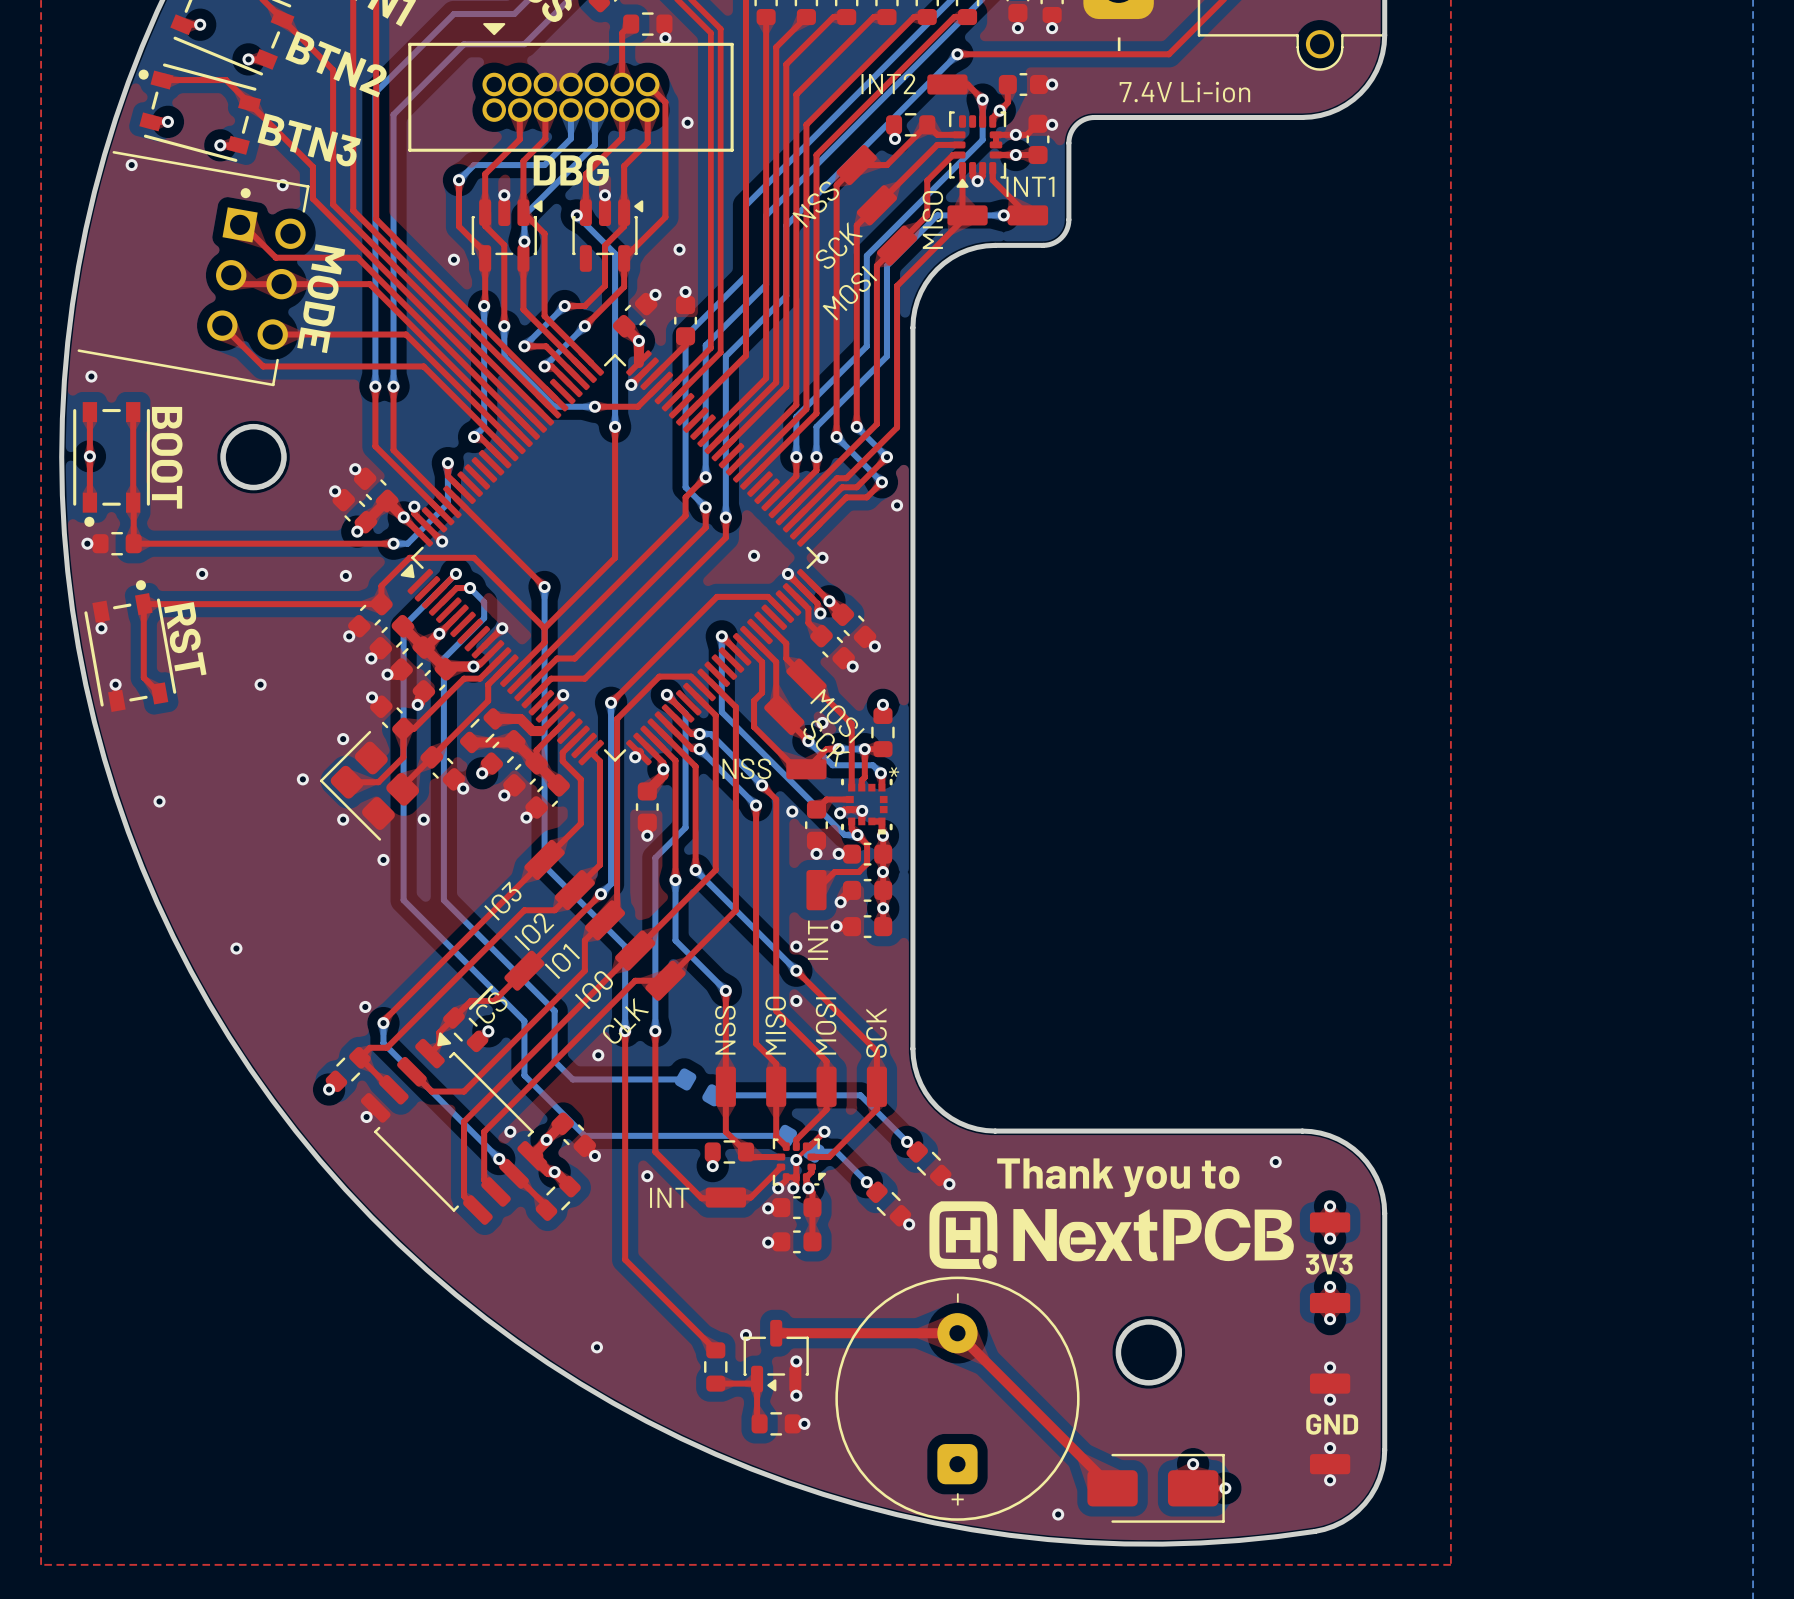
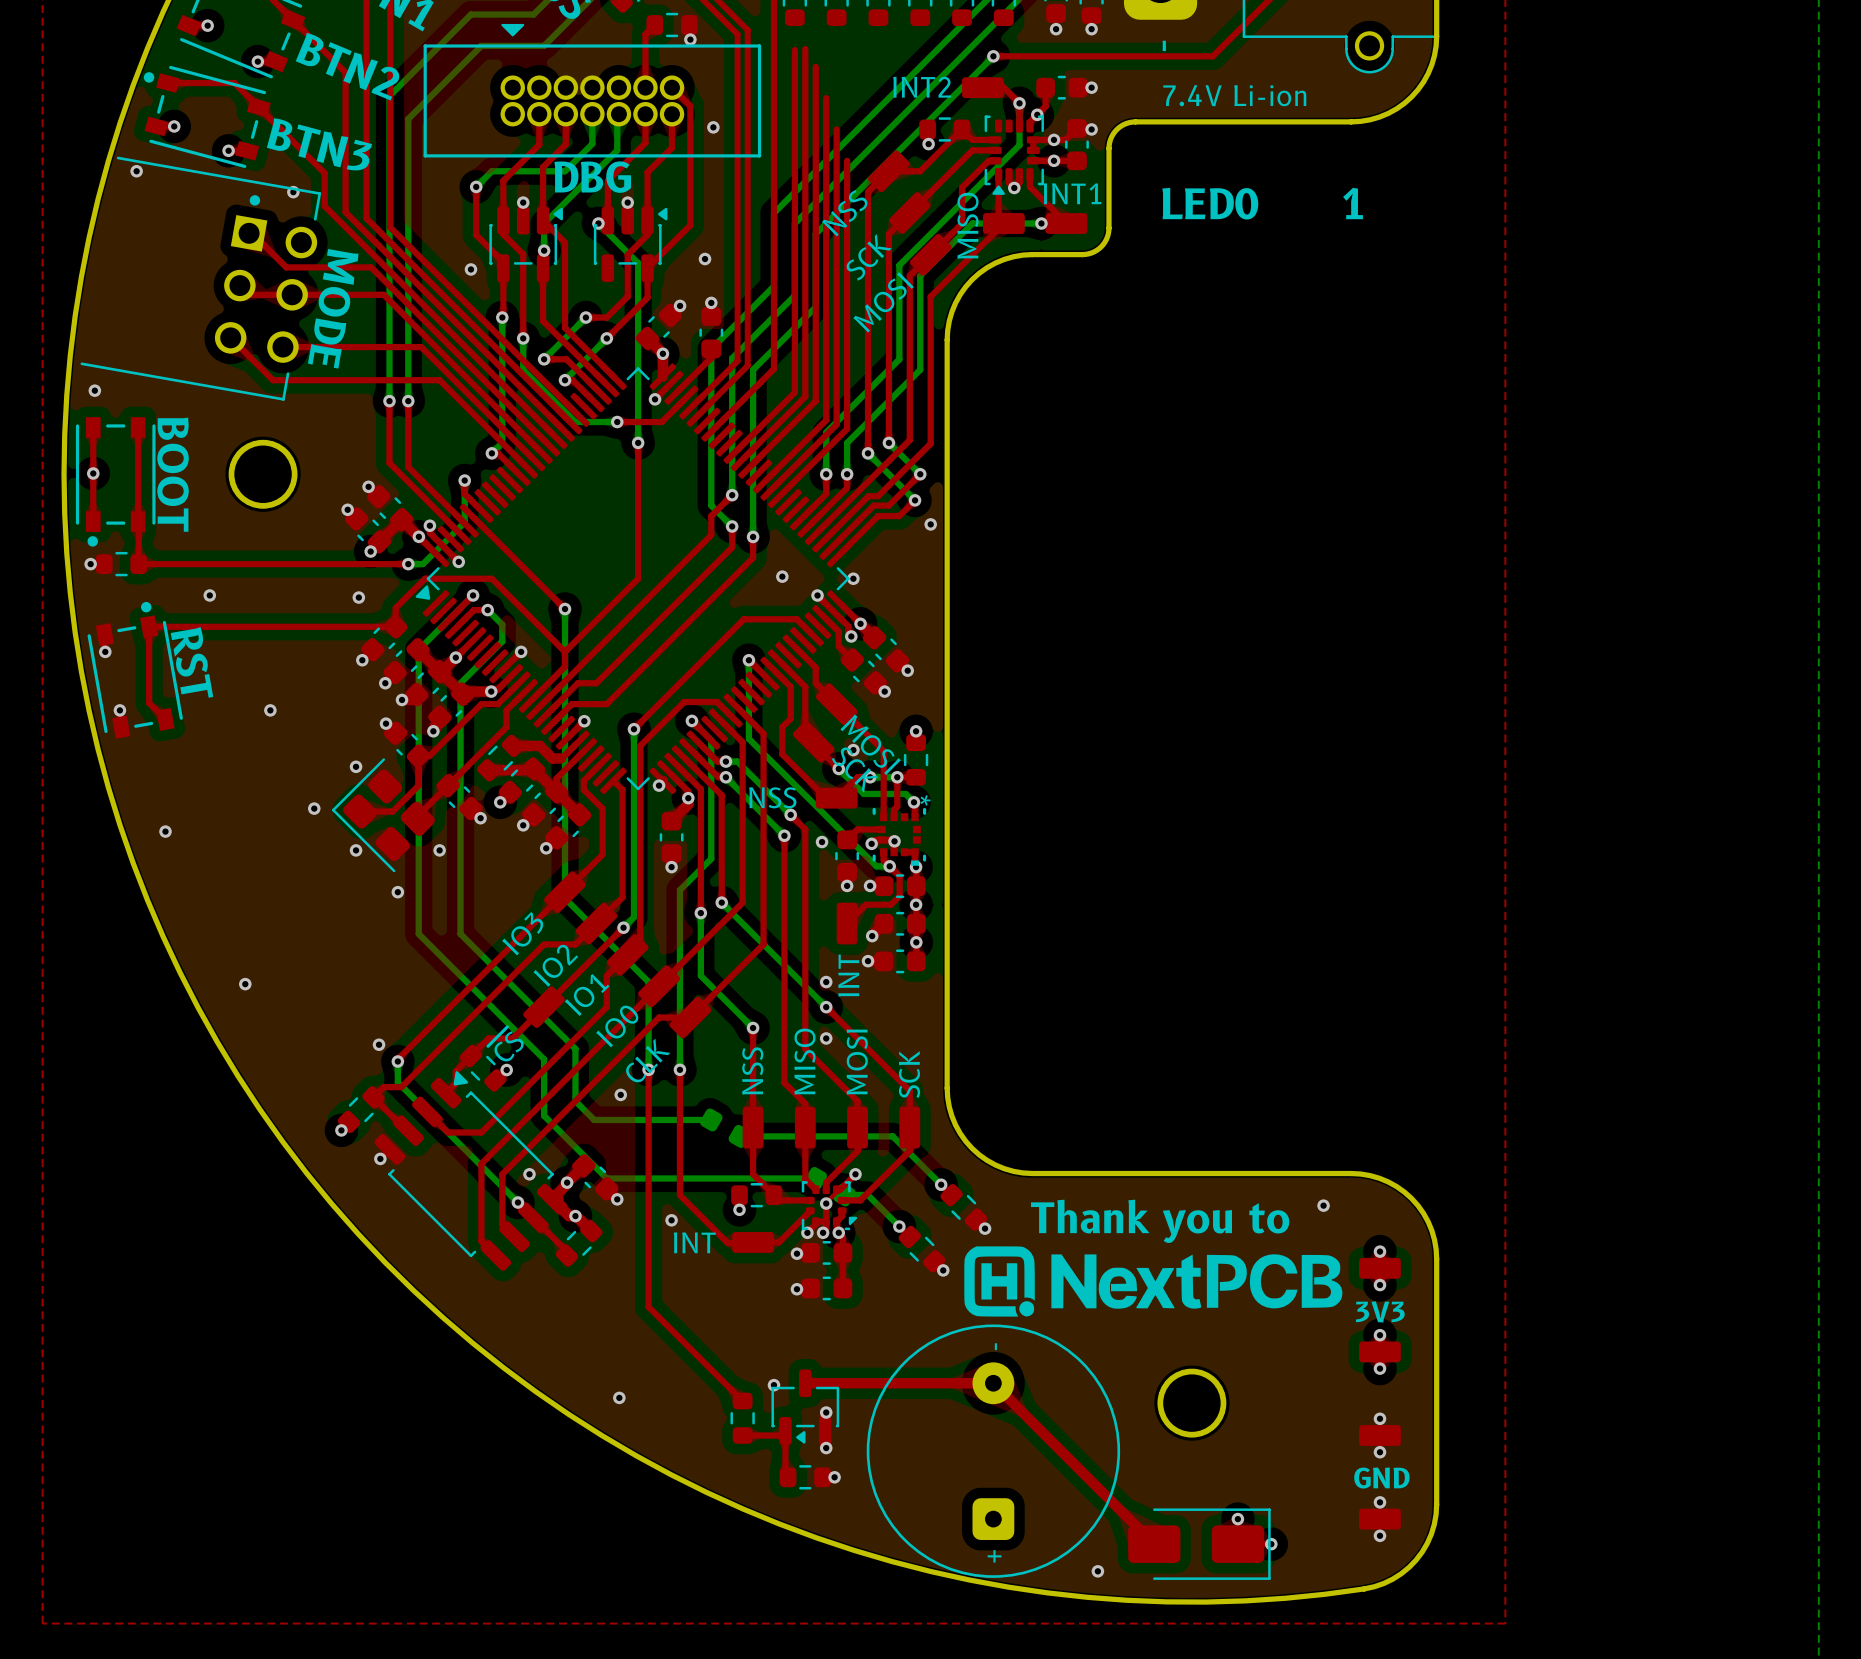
top track: (766, 17) (766, 48) -> none
top track: (806, 17) (776, 47) -> none
top track: (846, 17) (833, 17) (786, 64) -> none
top track: (886, 17) (873, 17) (796, 94) -> none
top track: (927, 17) (914, 17) (806, 124) -> none
top track: (967, 17) (954, 17) (816, 154) -> none
text: none -> LED0 (1210, 203)
text: none -> 1 (1353, 203)

